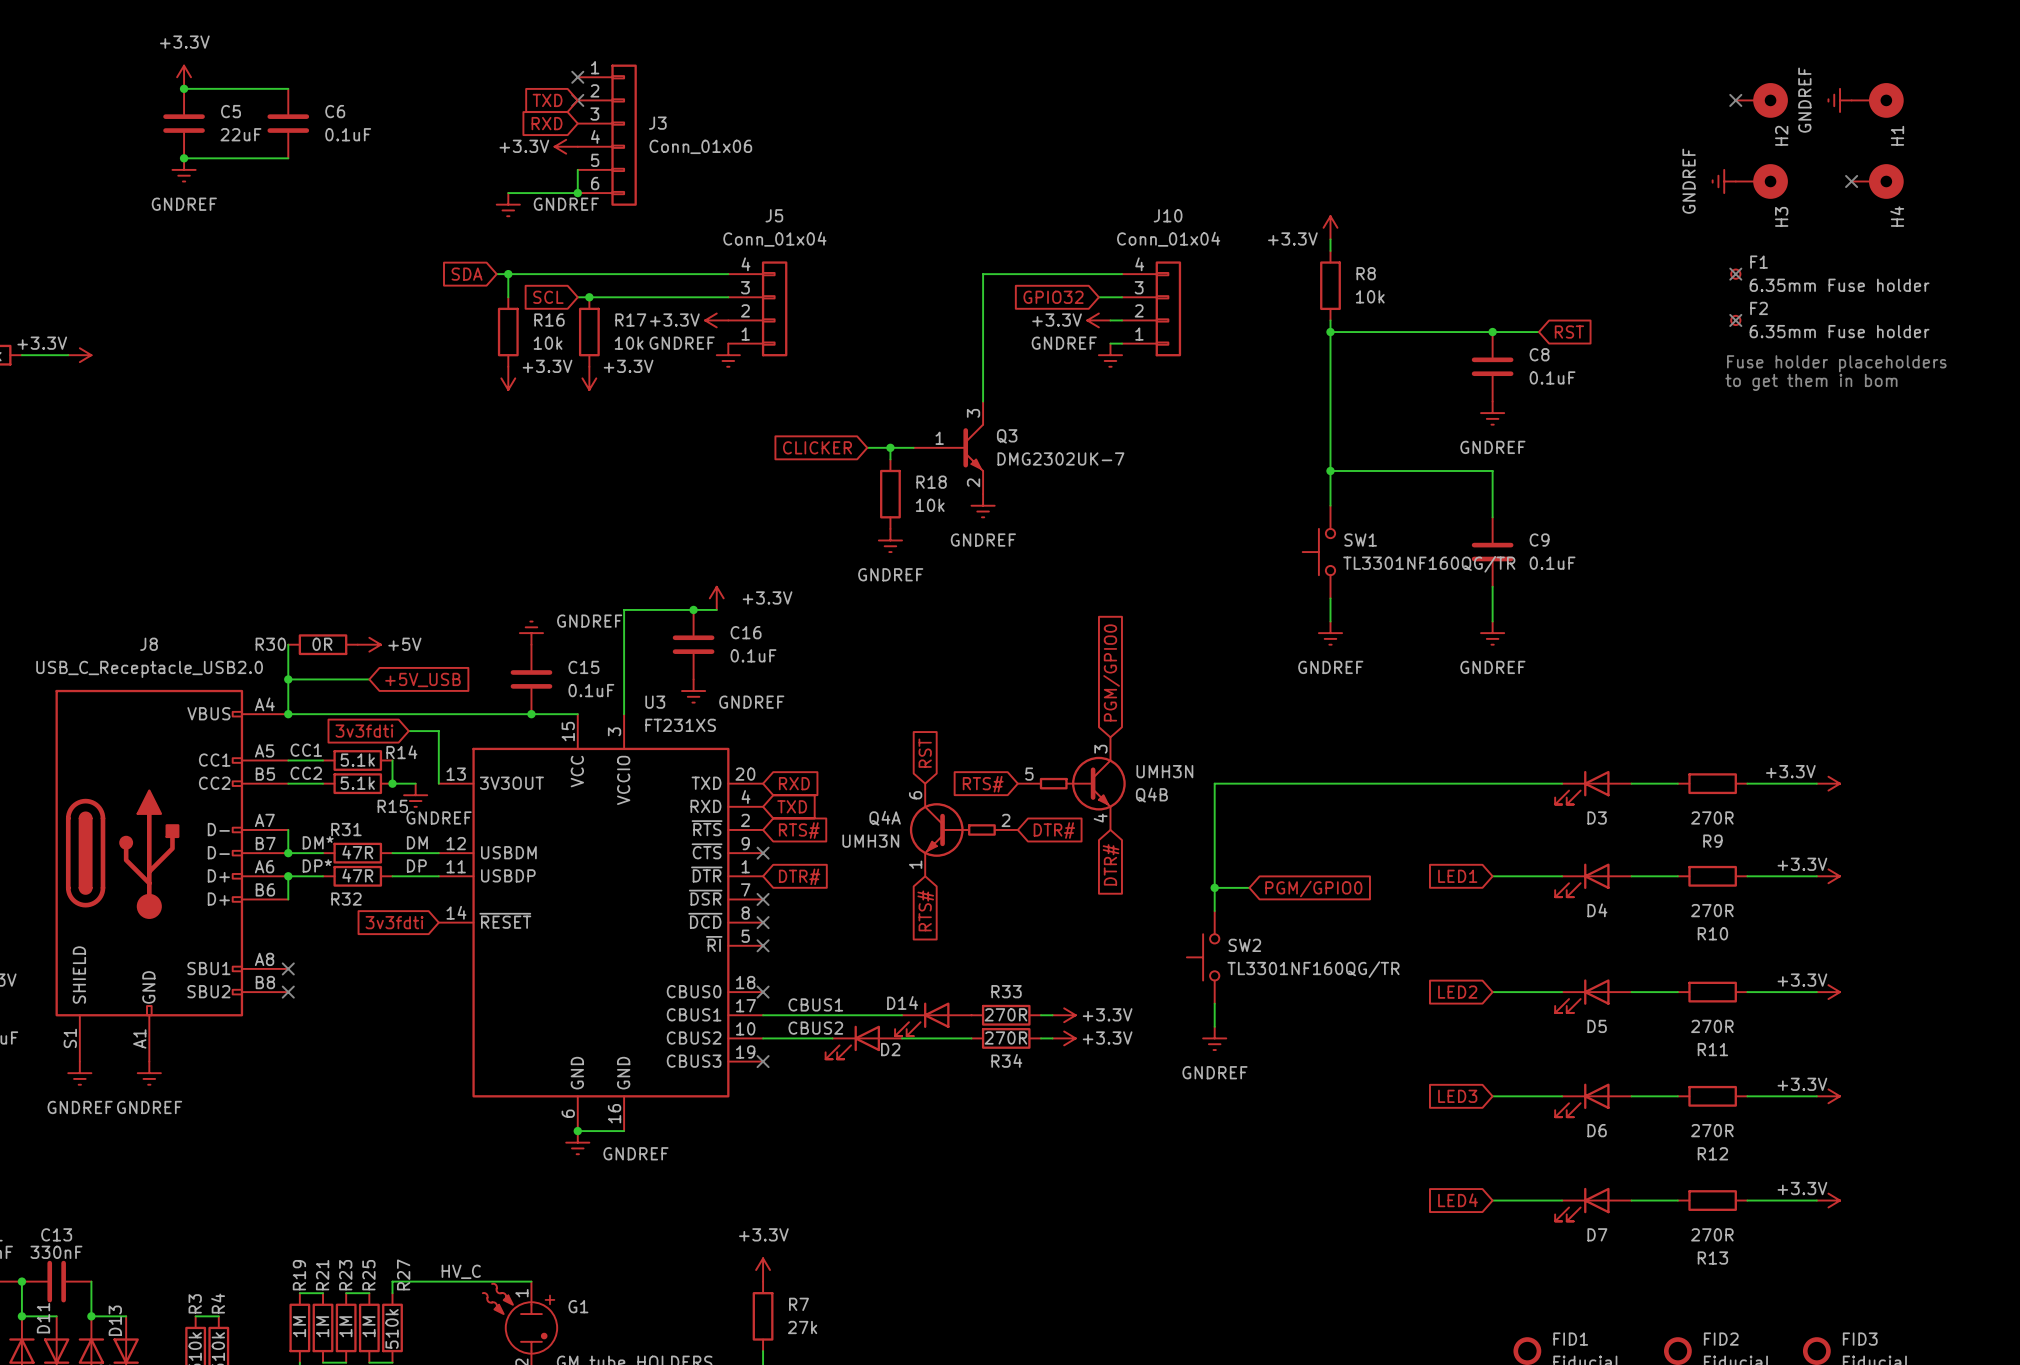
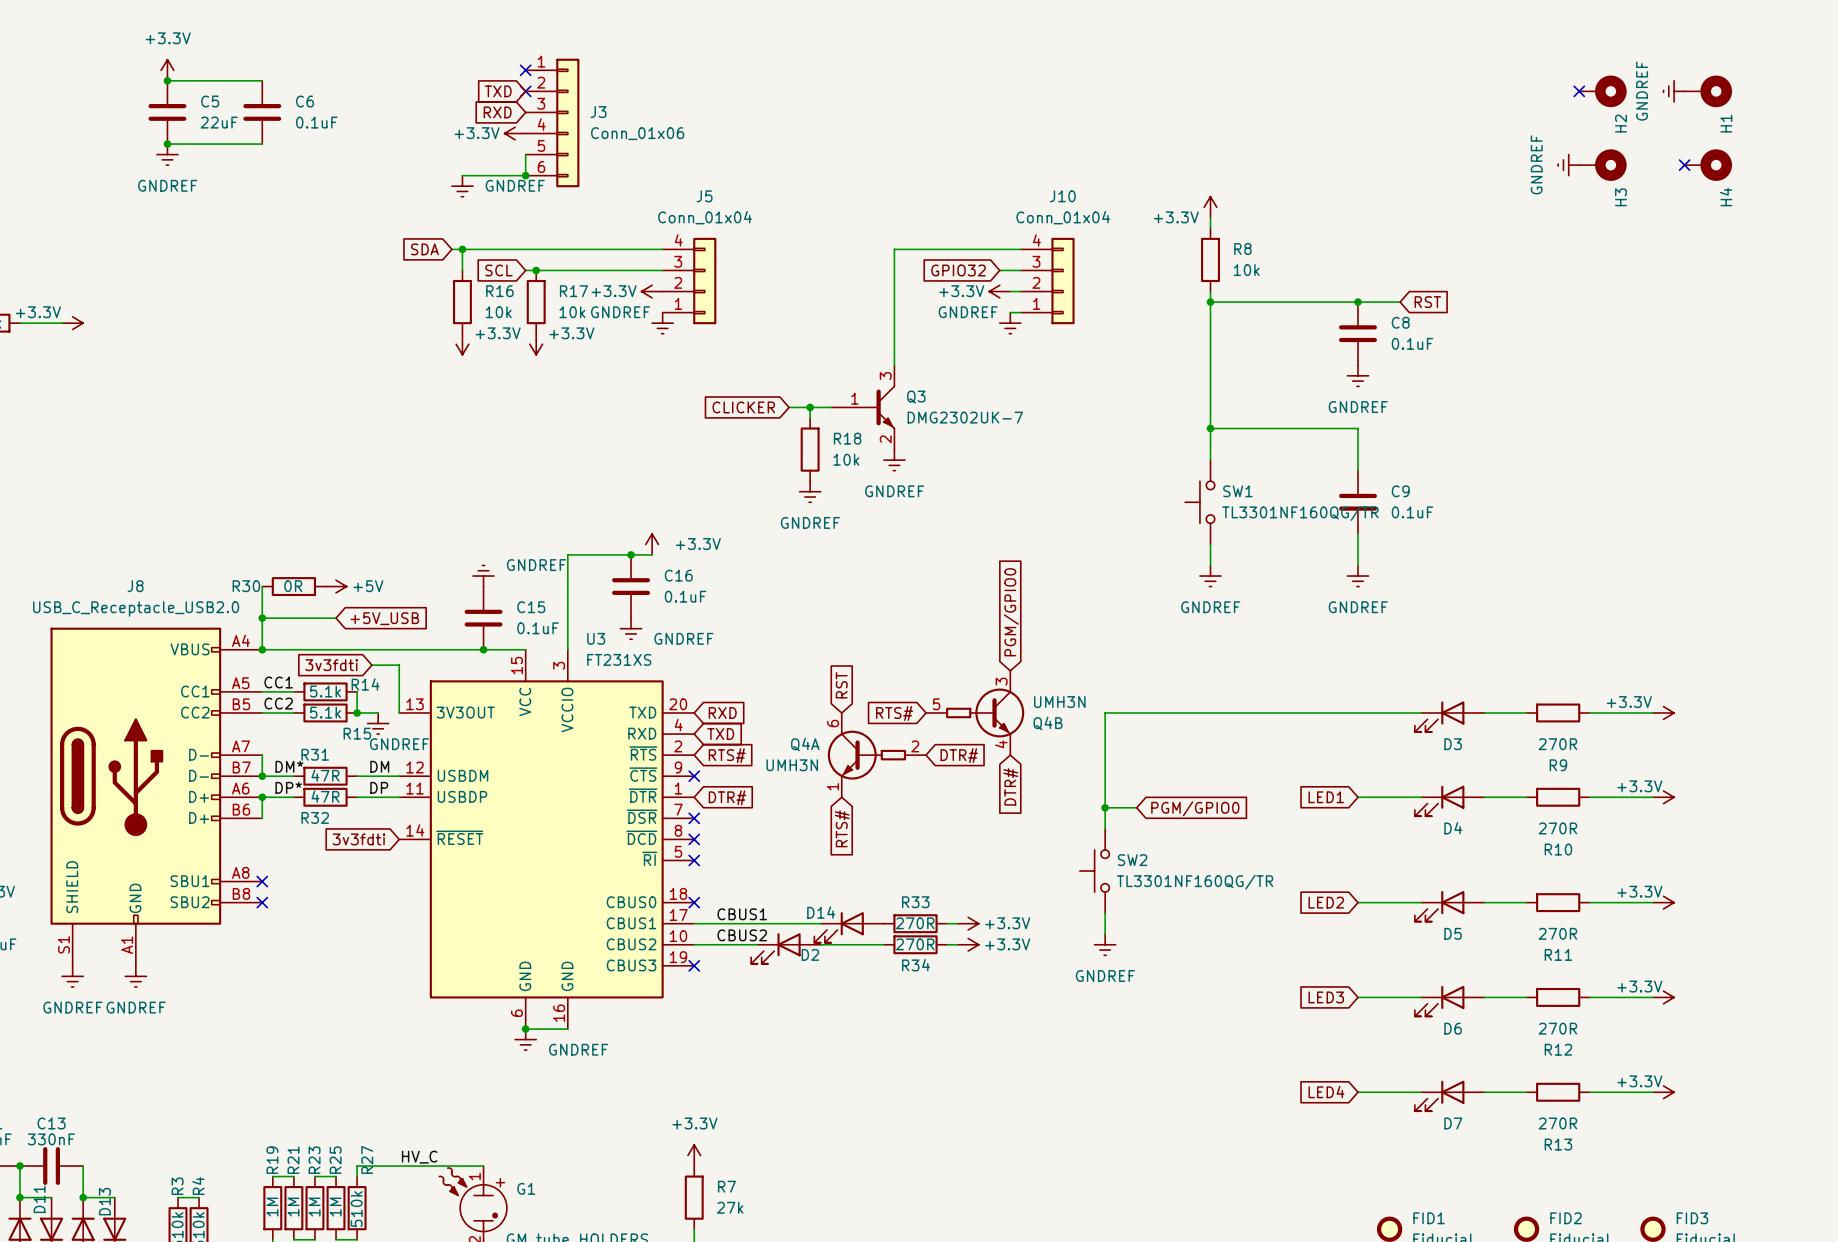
no-connect mark: (1735, 274) -> none
F1: 6.35mm Fuse holder (1735, 274) -> none
no-connect mark: (1735, 320) -> none
F2: 6.35mm Fuse holder (1735, 320) -> none
text: Fuse holder placeholders (1836, 363) -> none
text: to get them in bom (1811, 382) -> none

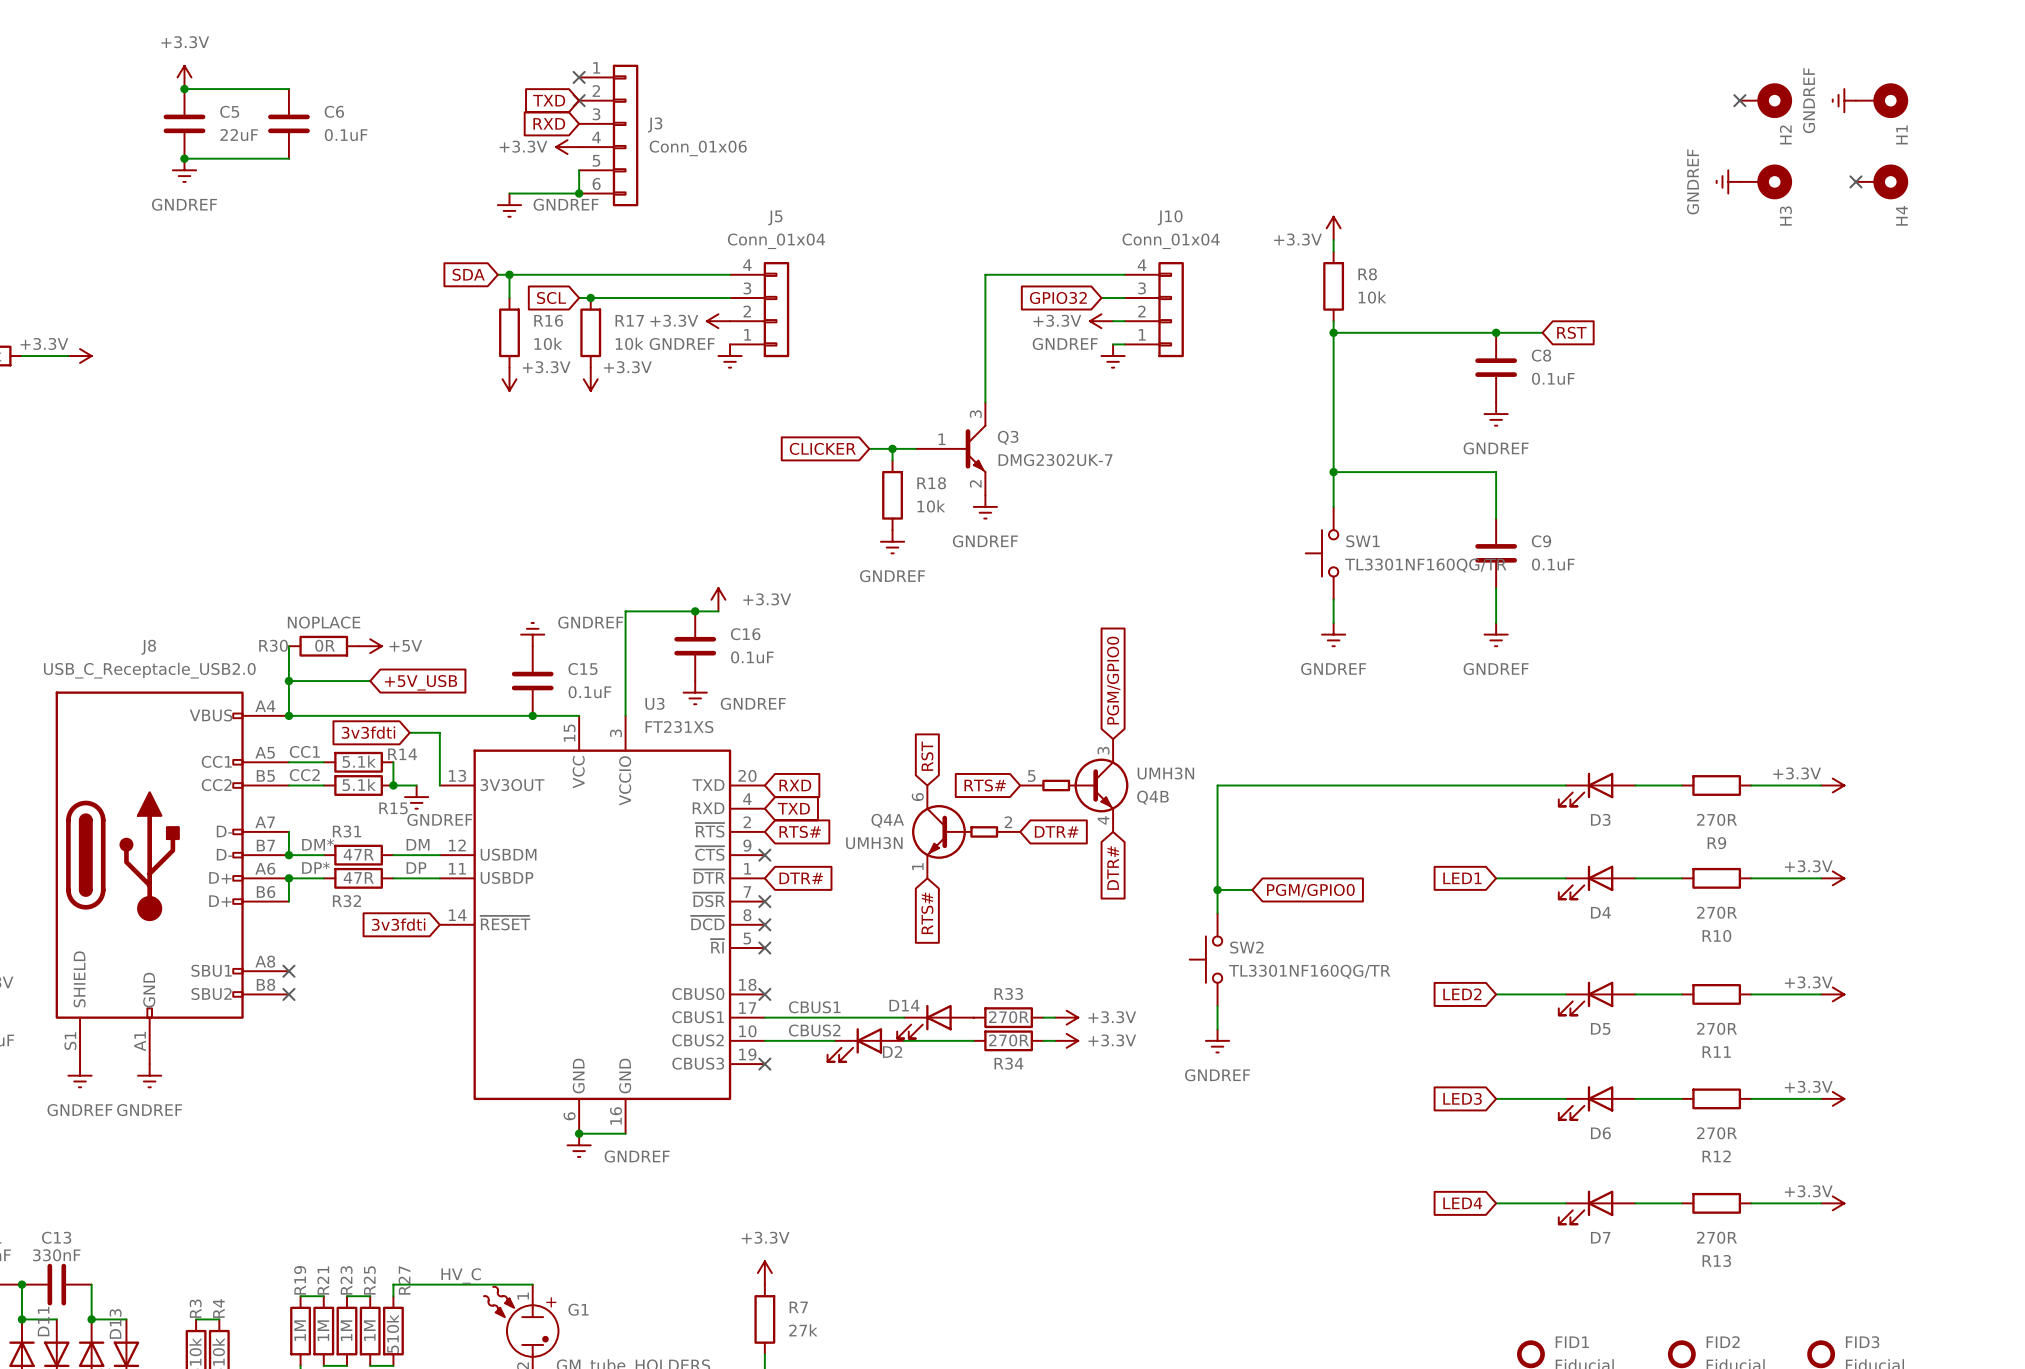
R30 text: none -> NOPLACE (324, 622)

